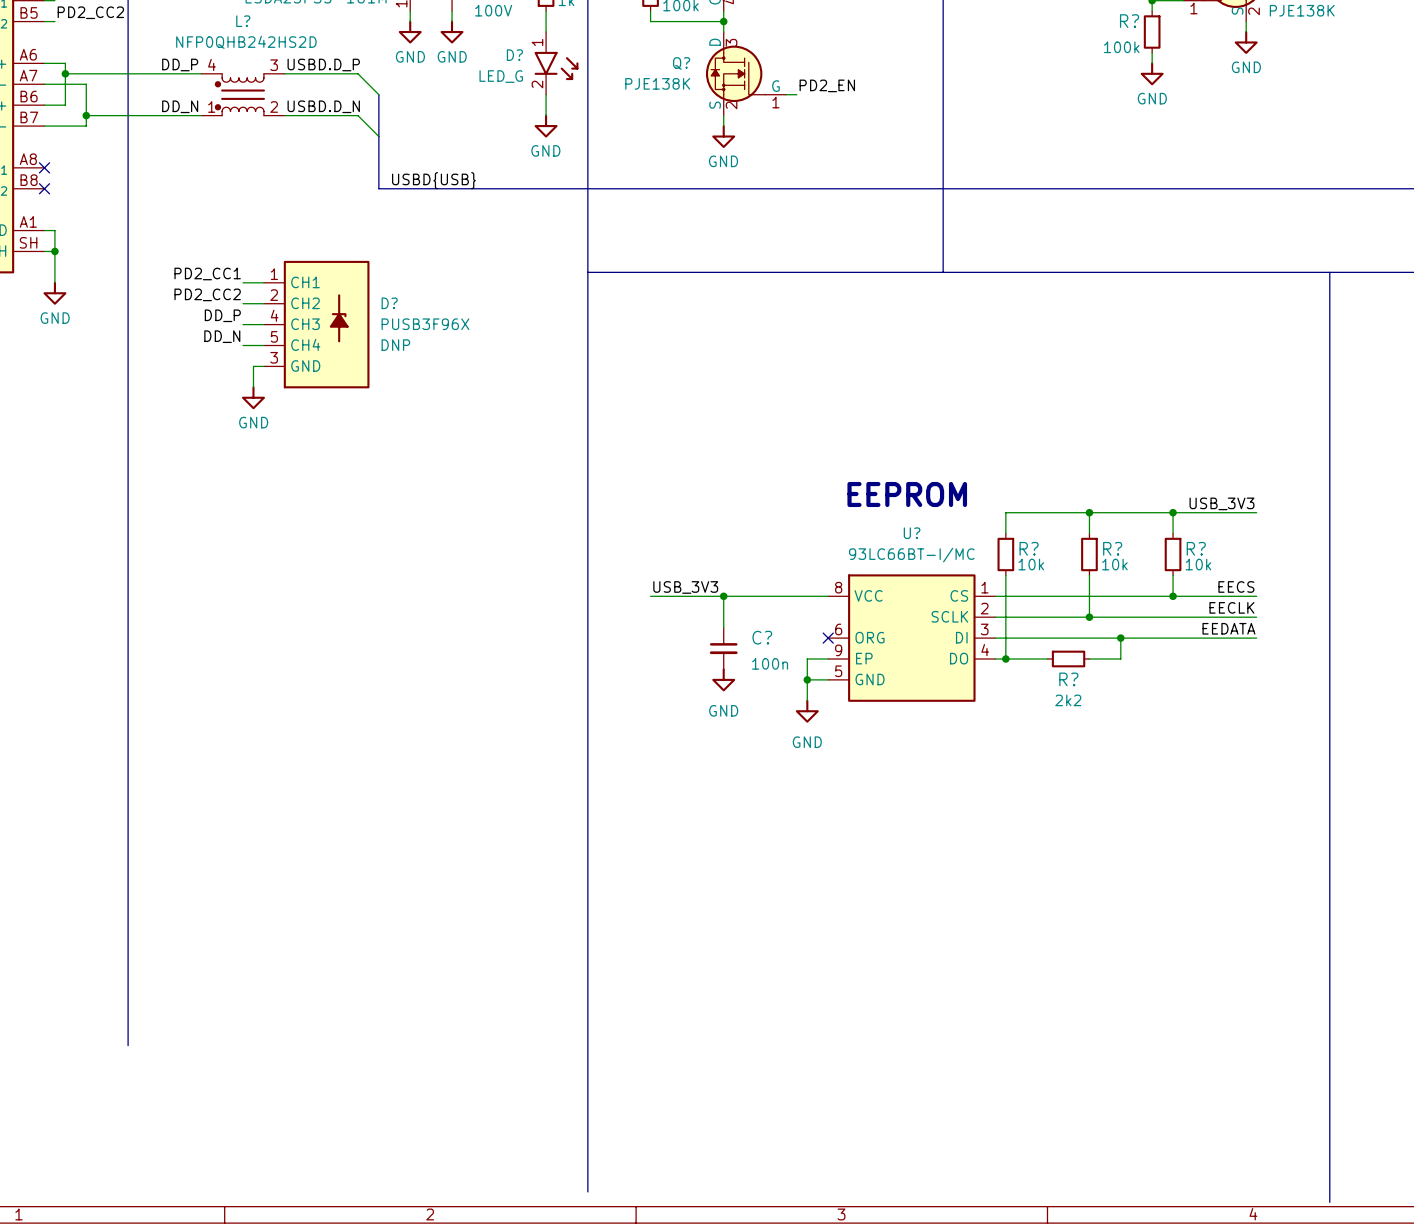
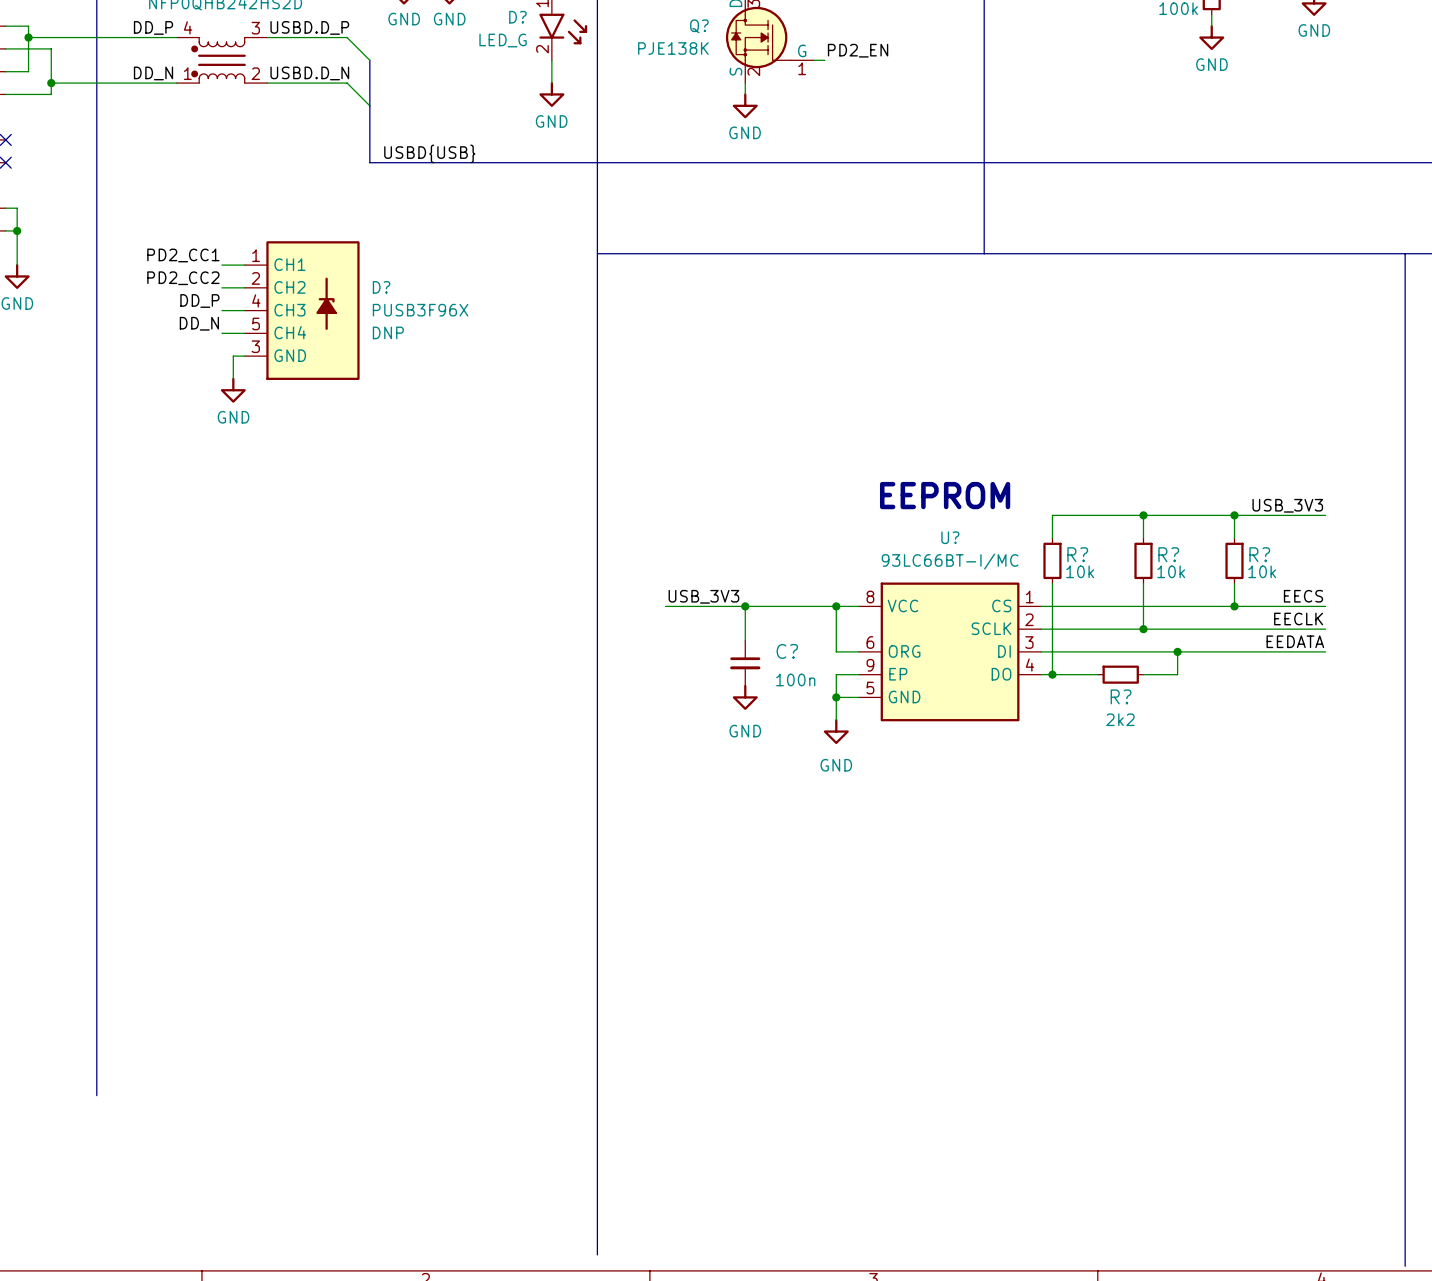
wire: none -> (836, 606) (836, 651) (859, 651)
junction: none -> (836, 606)
no-connect mark: (828, 638) -> none

